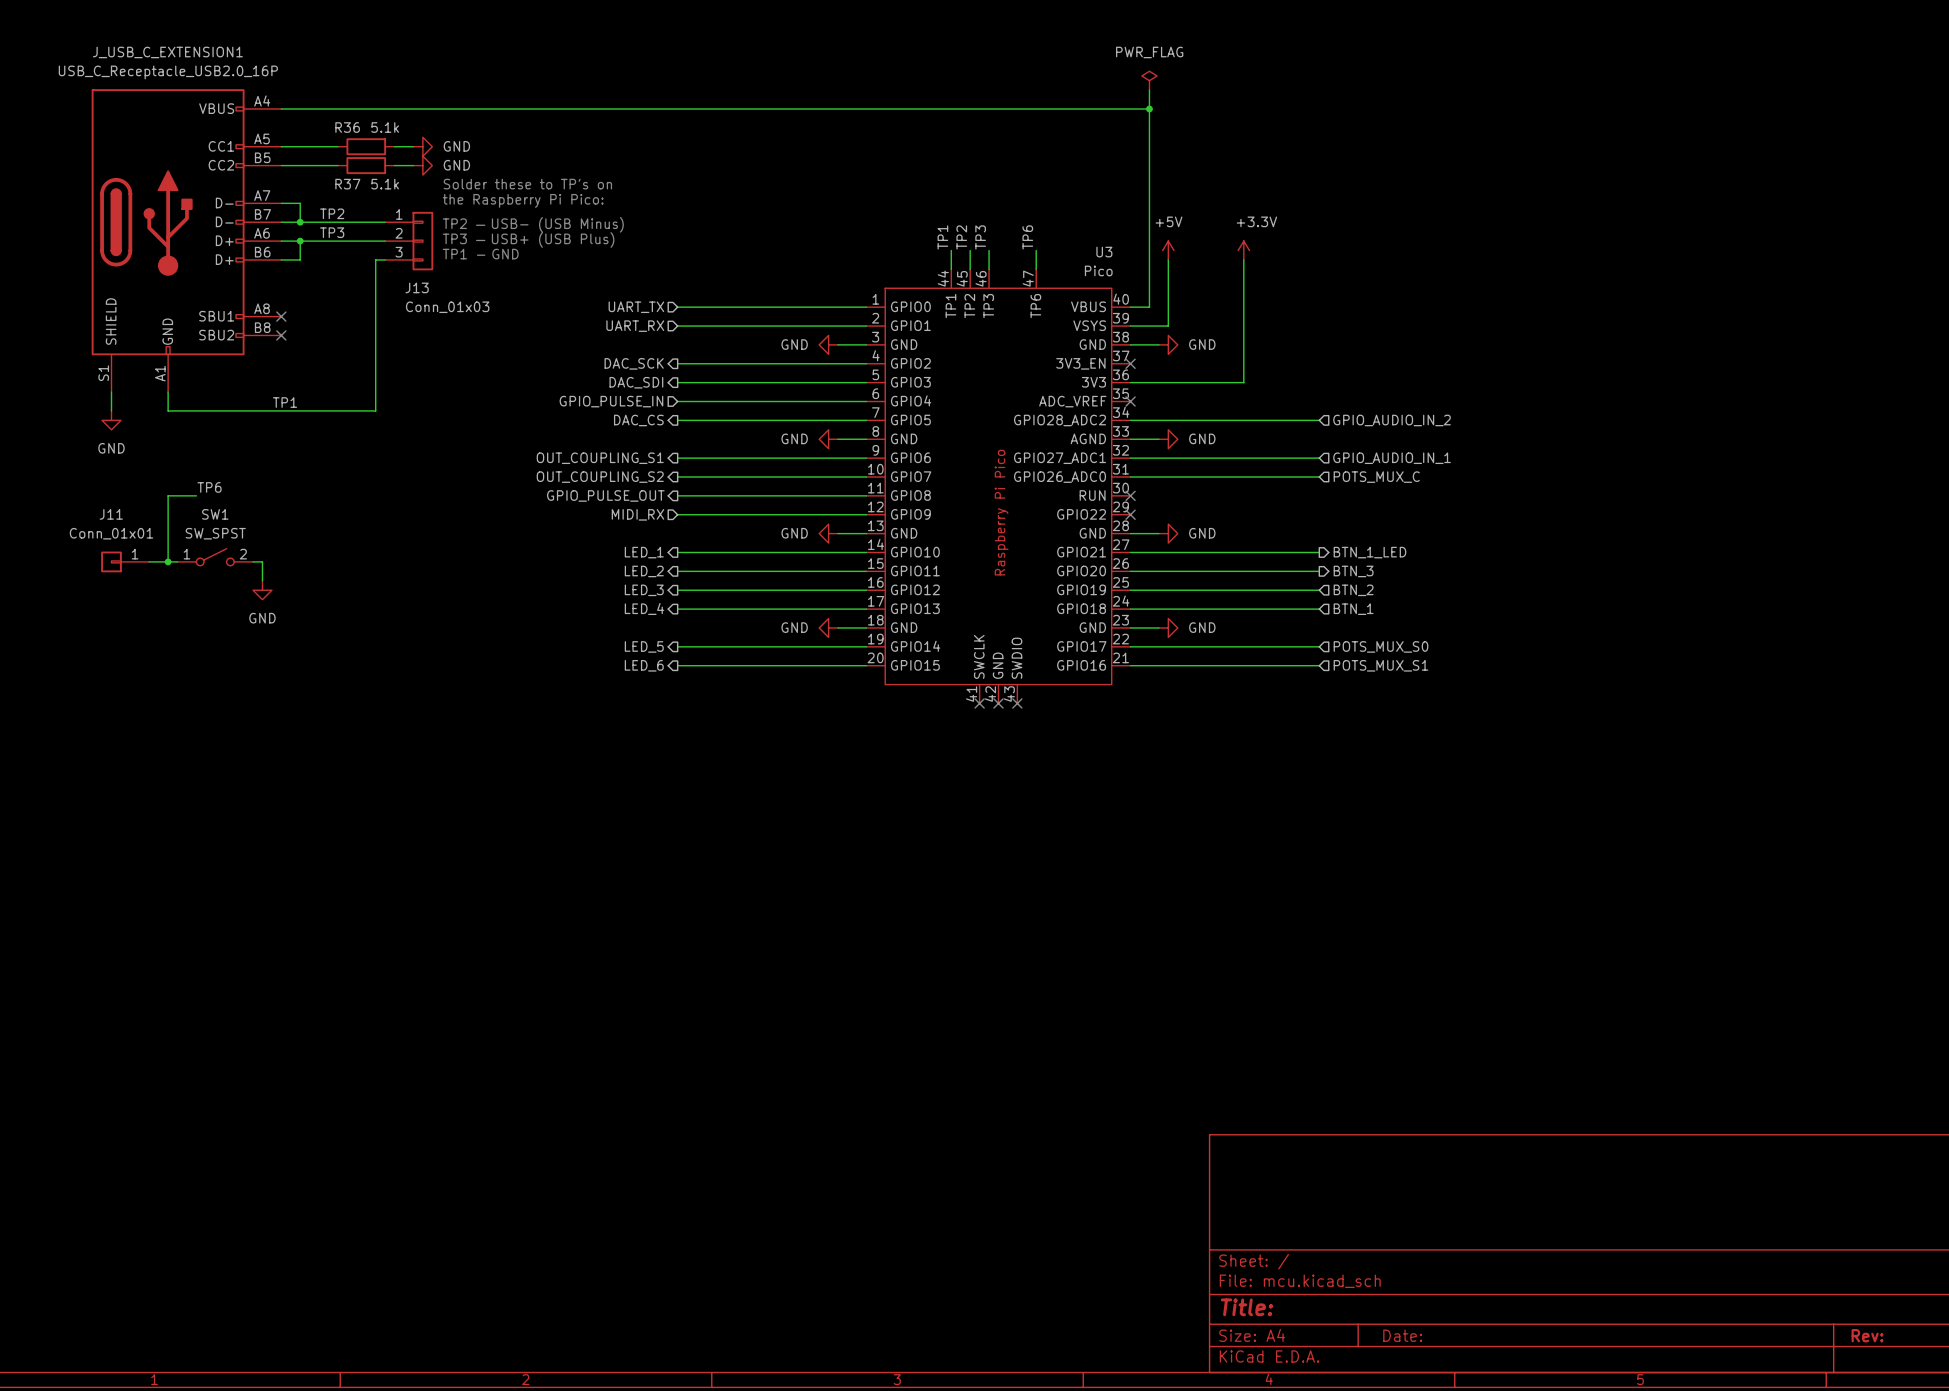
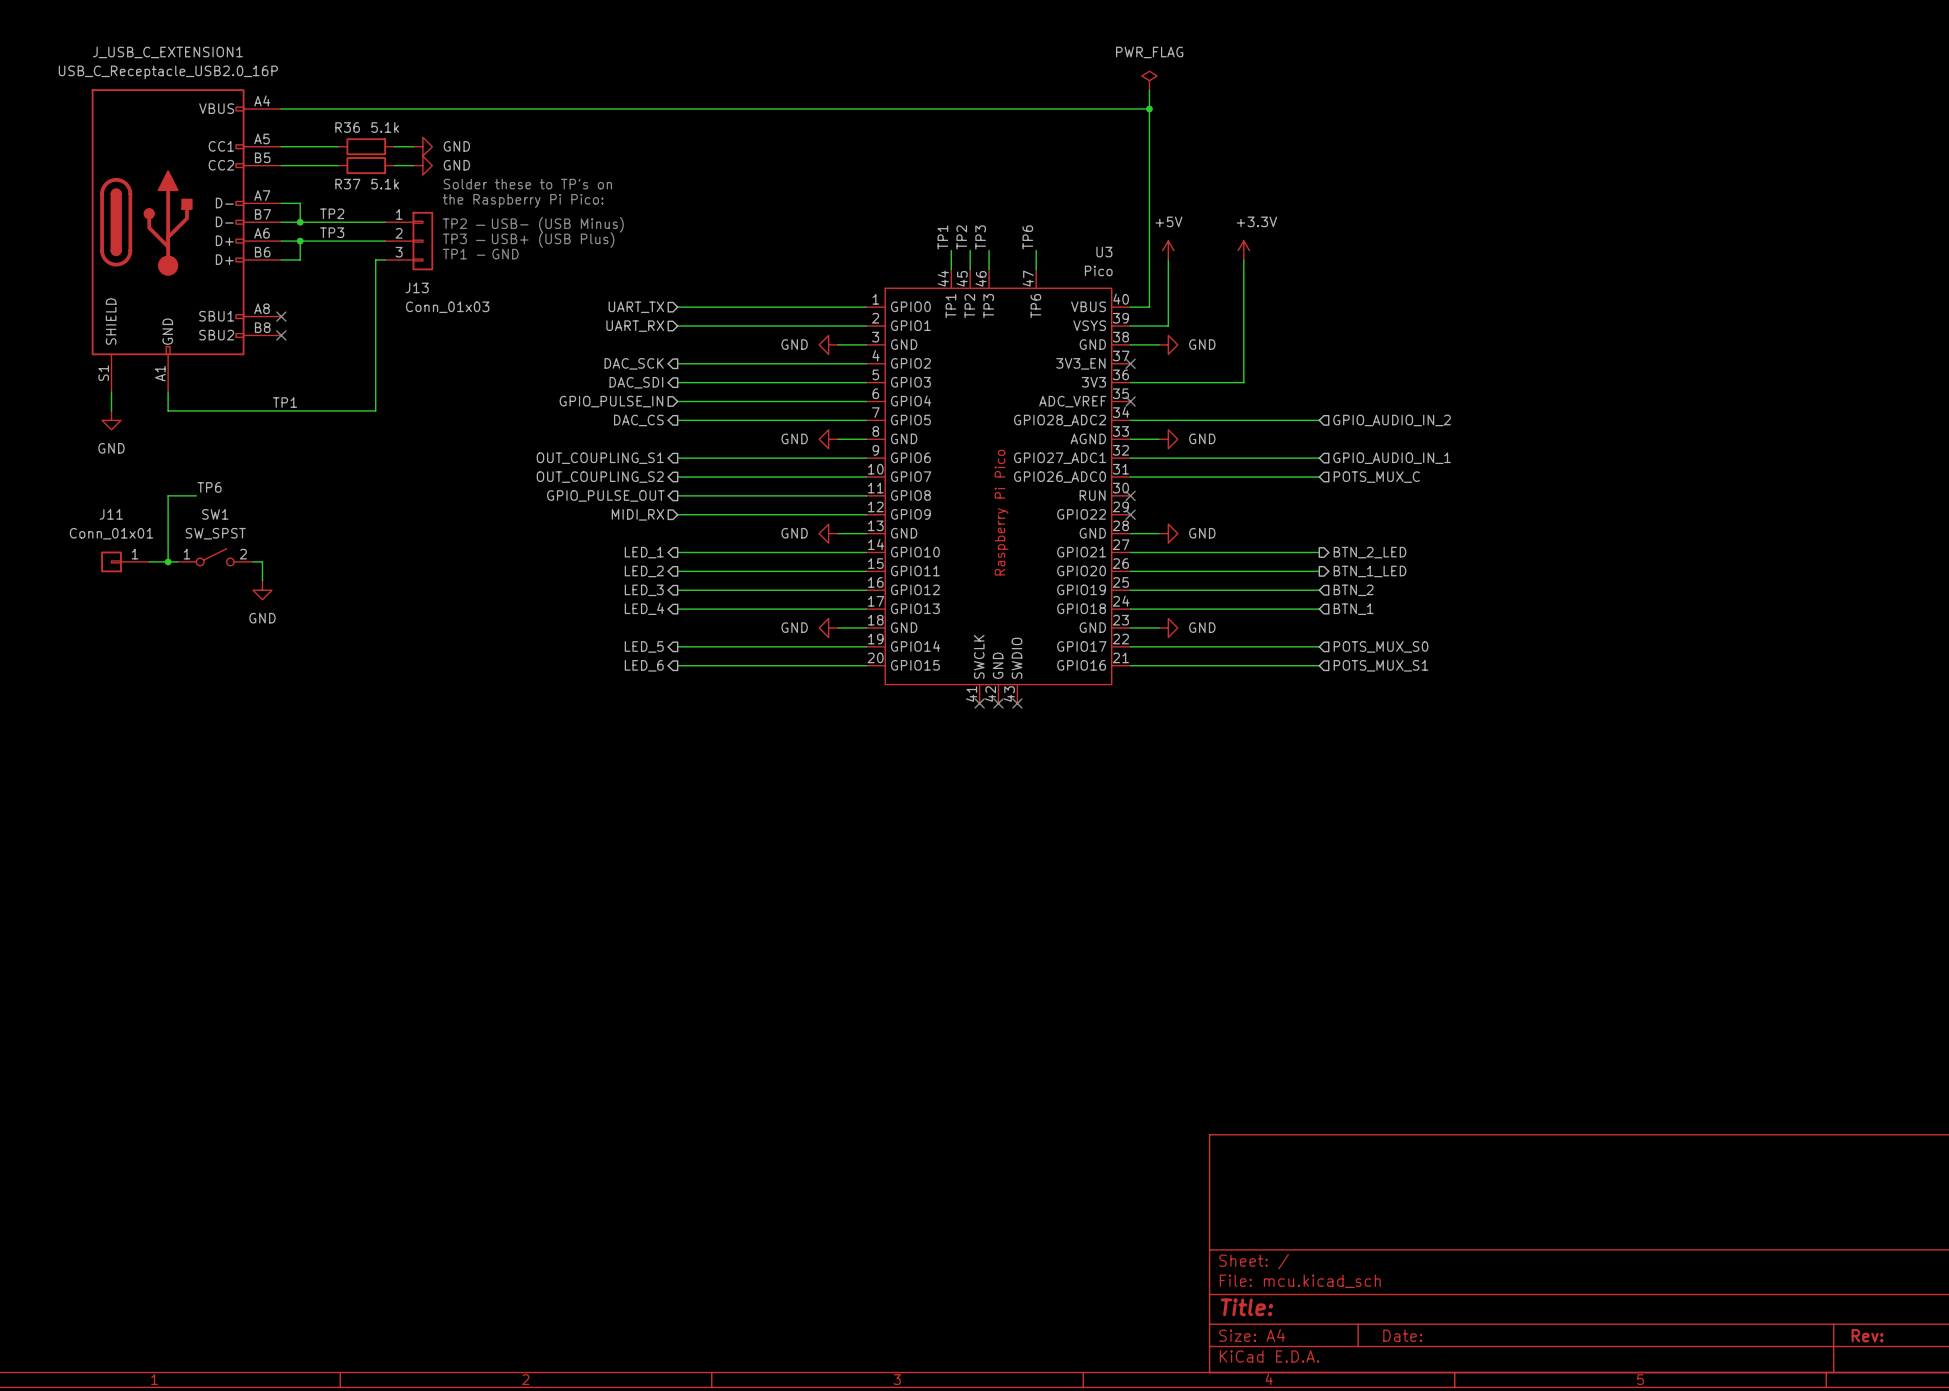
hierarchical label: BTN_1_LED (1370, 552) -> BTN_2_LED (1370, 552)
hierarchical label: BTN_3 (1353, 571) -> BTN_1_LED (1370, 571)

